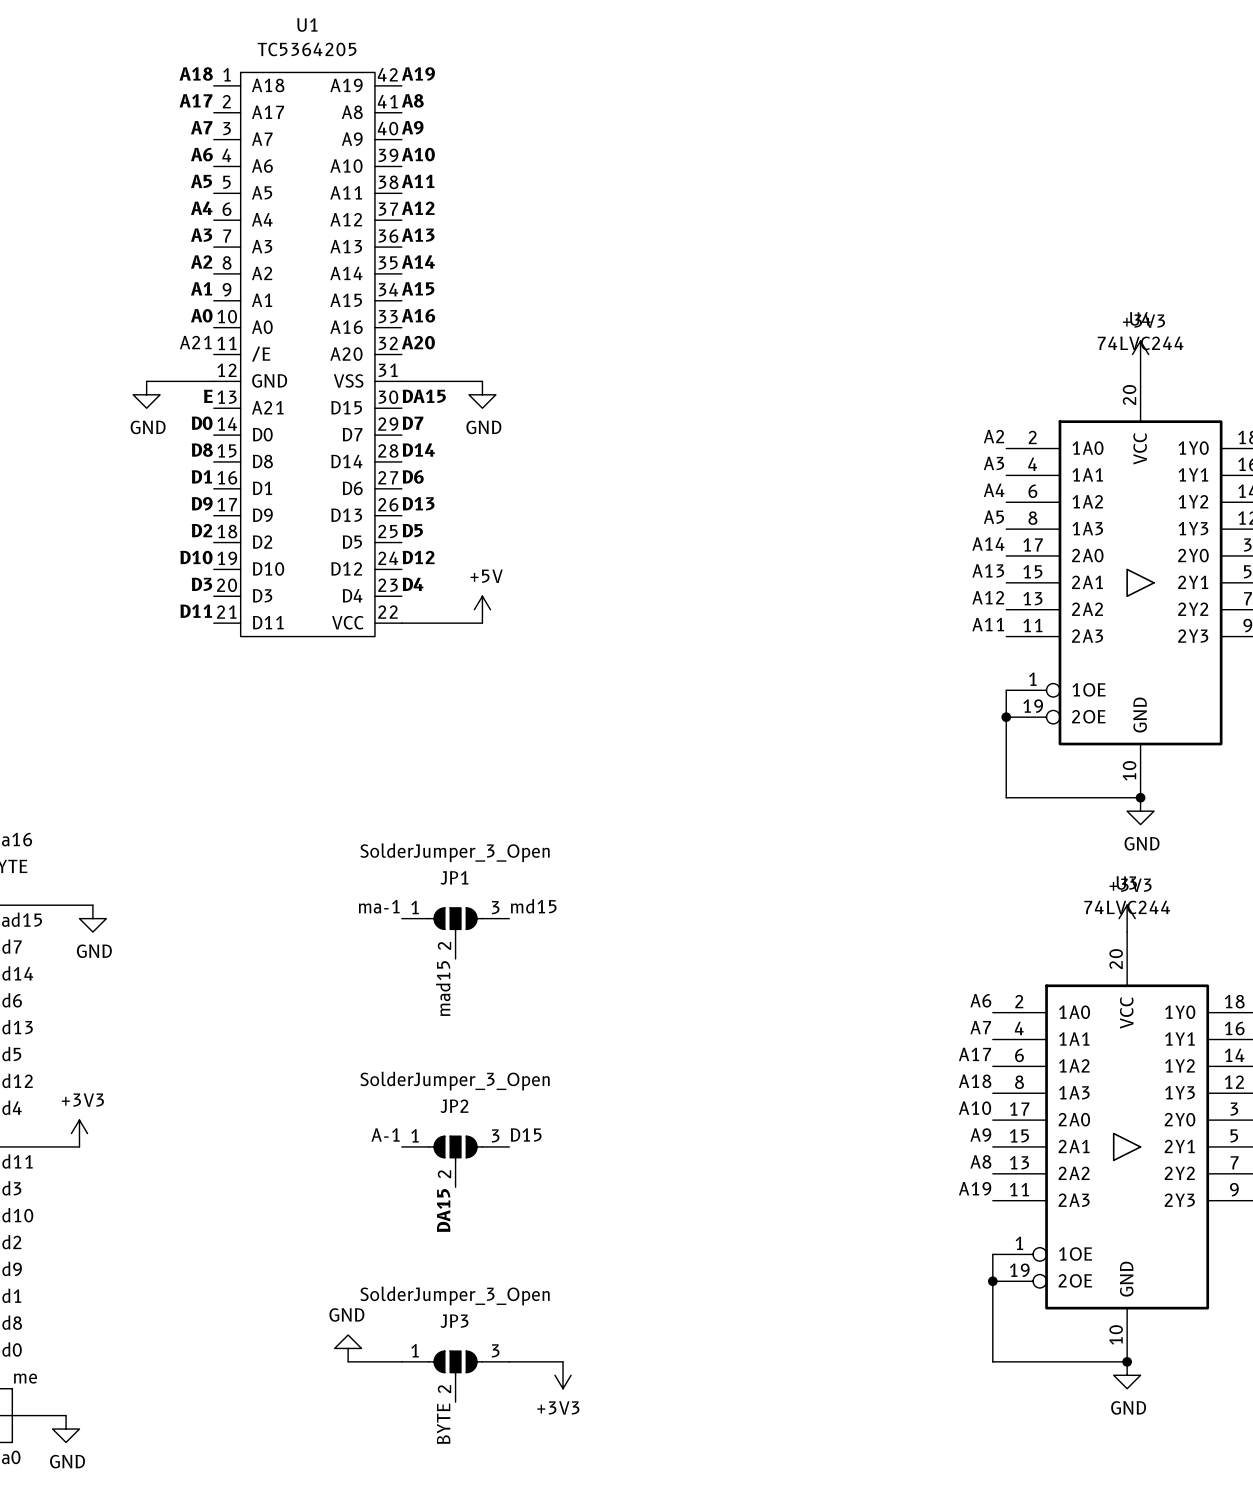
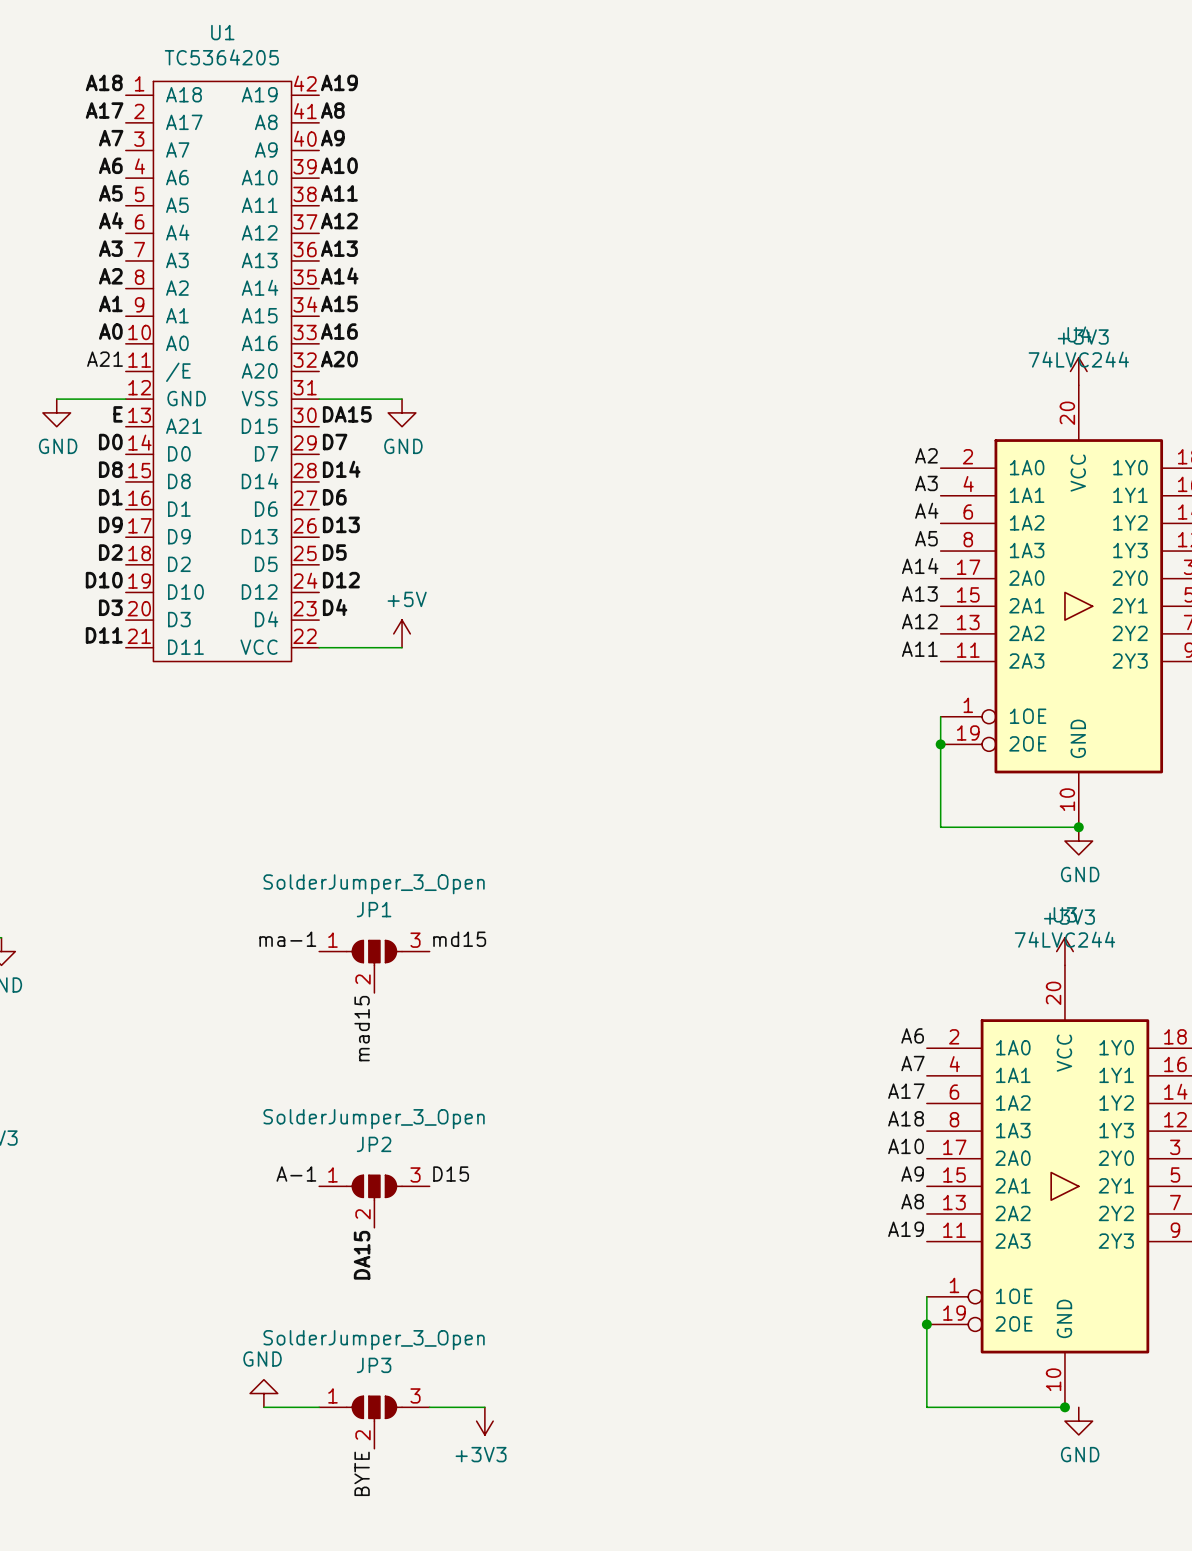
power symbol position: GND (1127, 1375) -> GND (1078, 1421)

